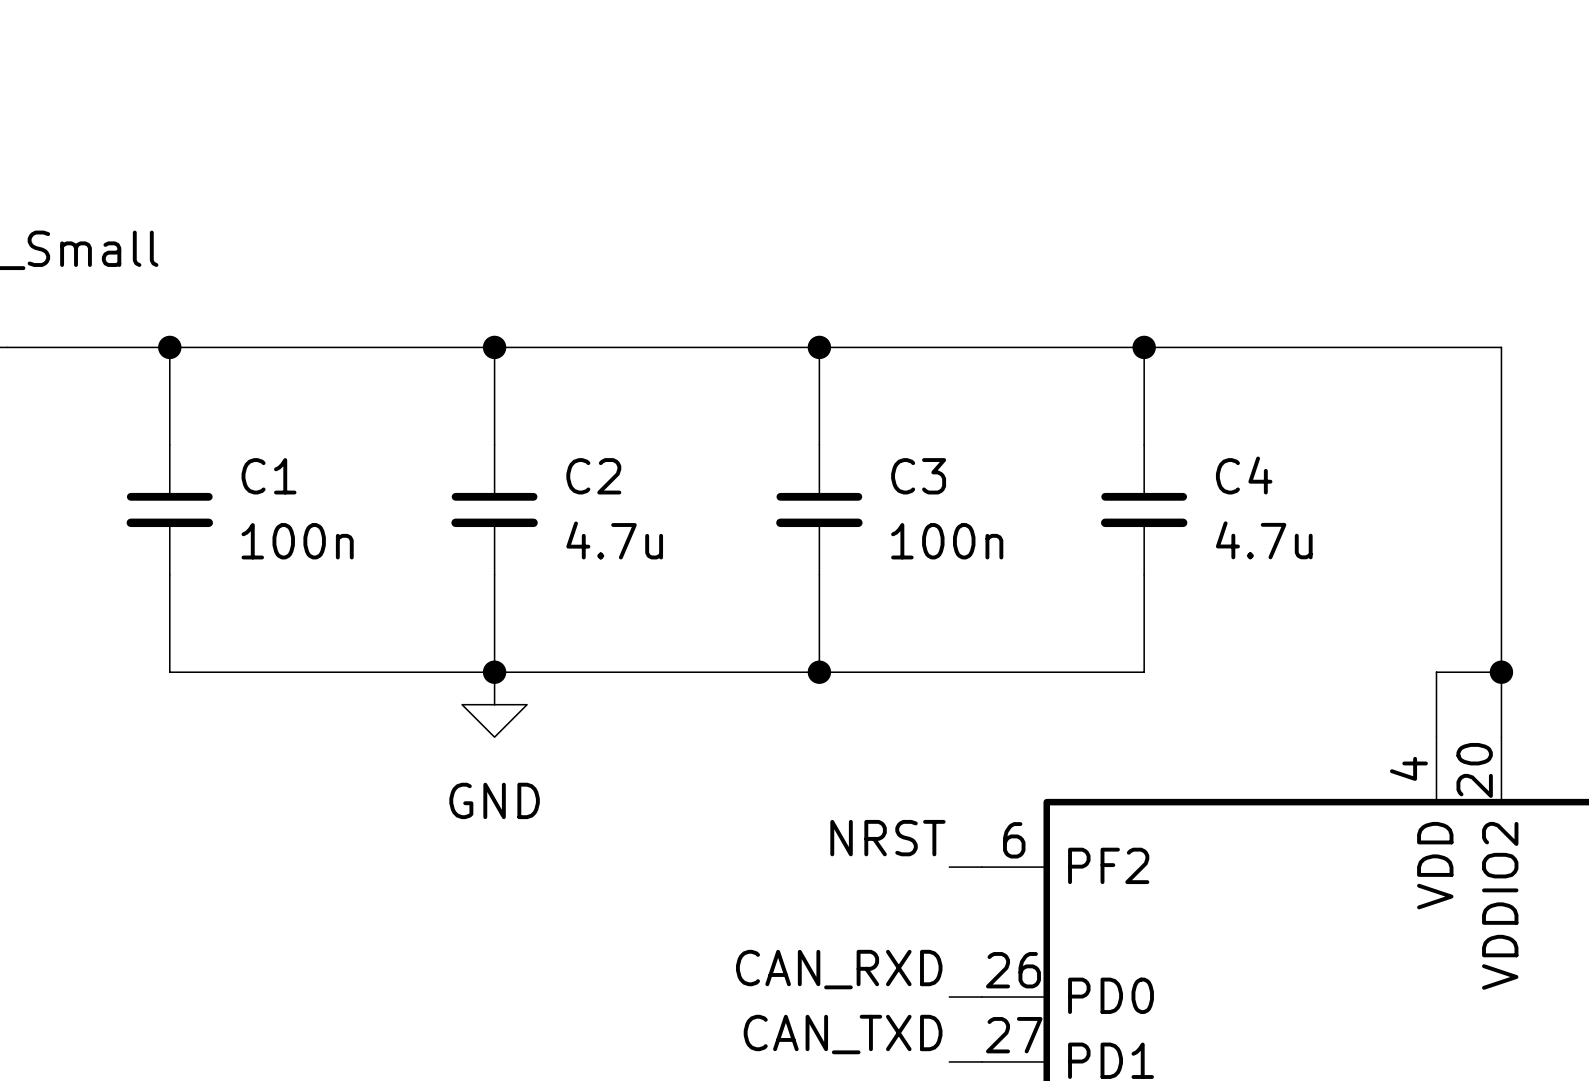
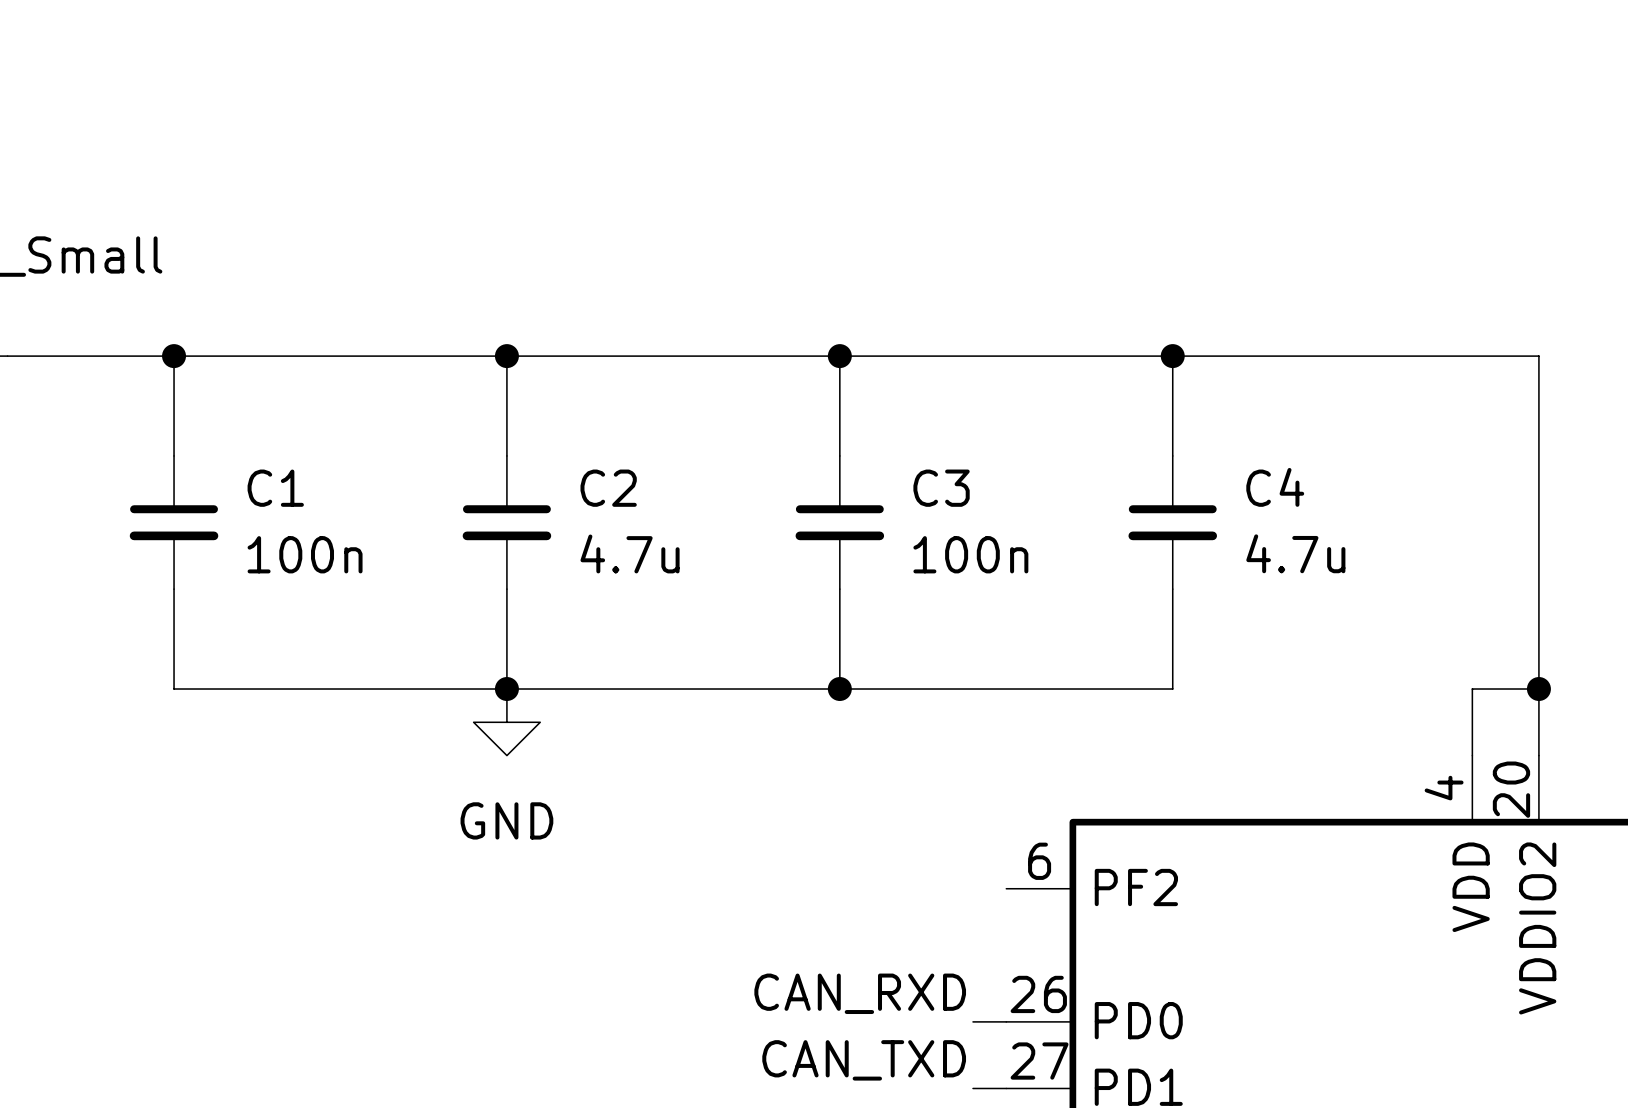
label: NRST (887, 838) -> none
wire: (949, 867) (981, 867) -> none

